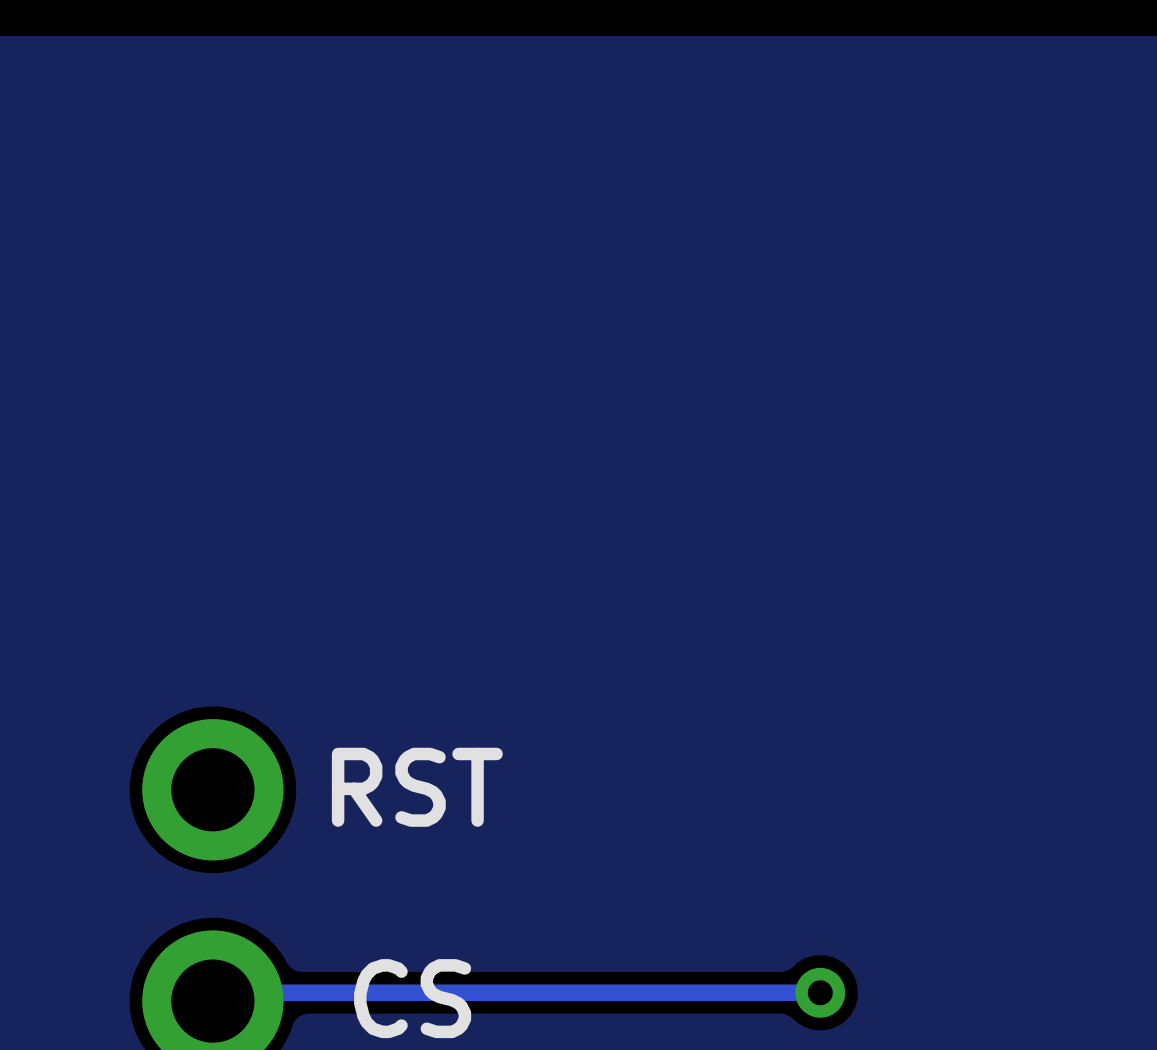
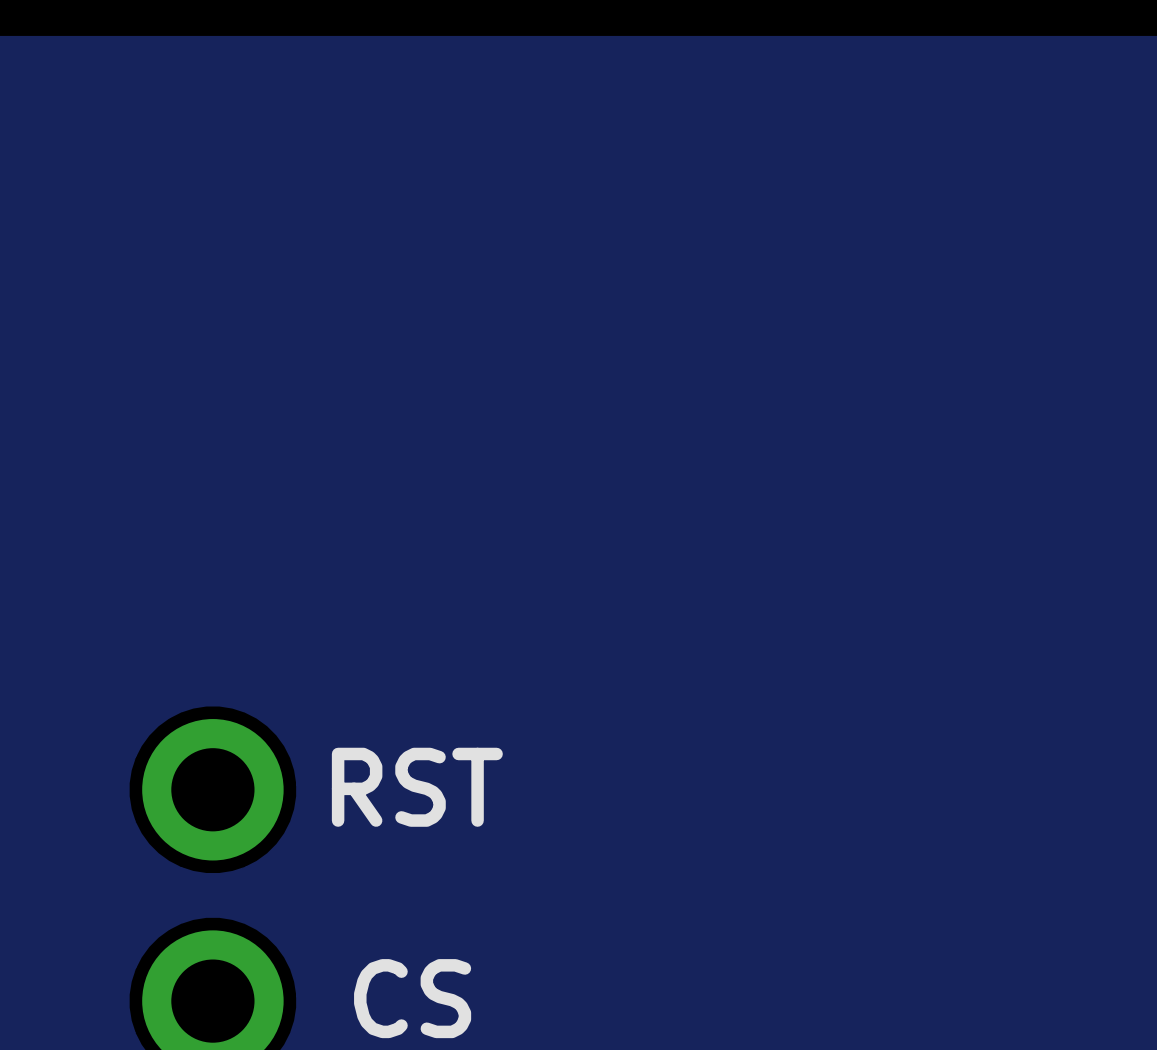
track: (820, 992) (221, 992) -> none
via: (820, 992) -> none

